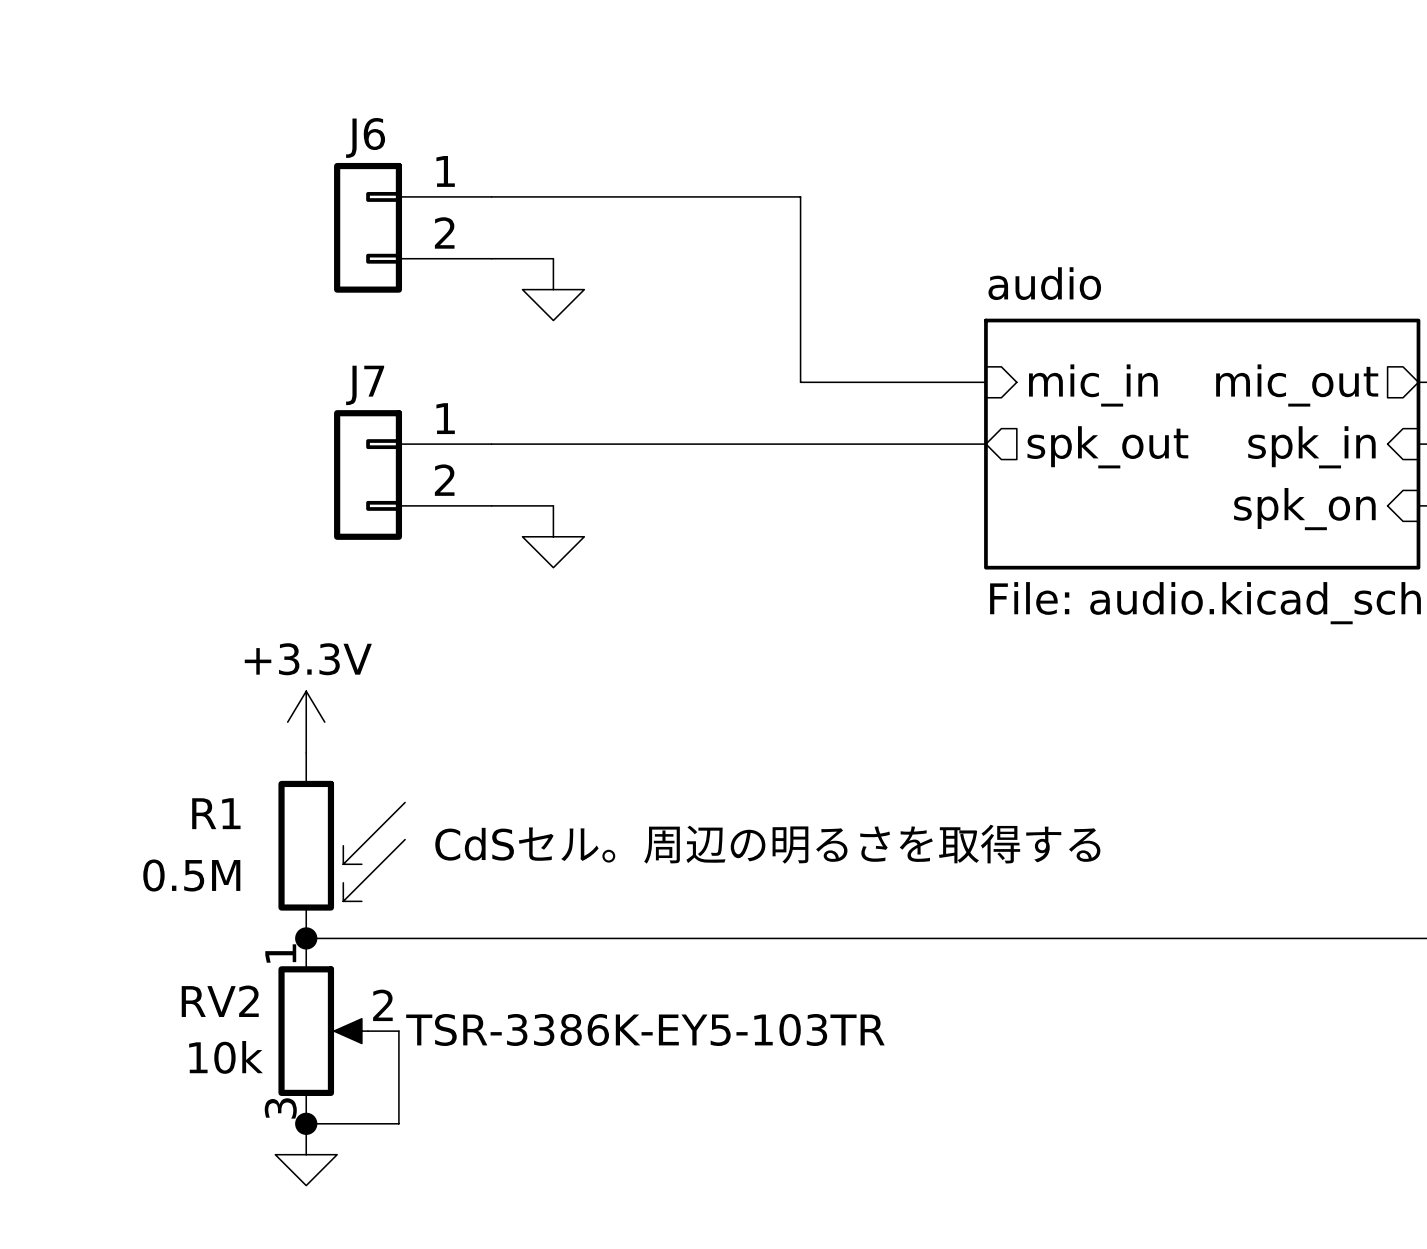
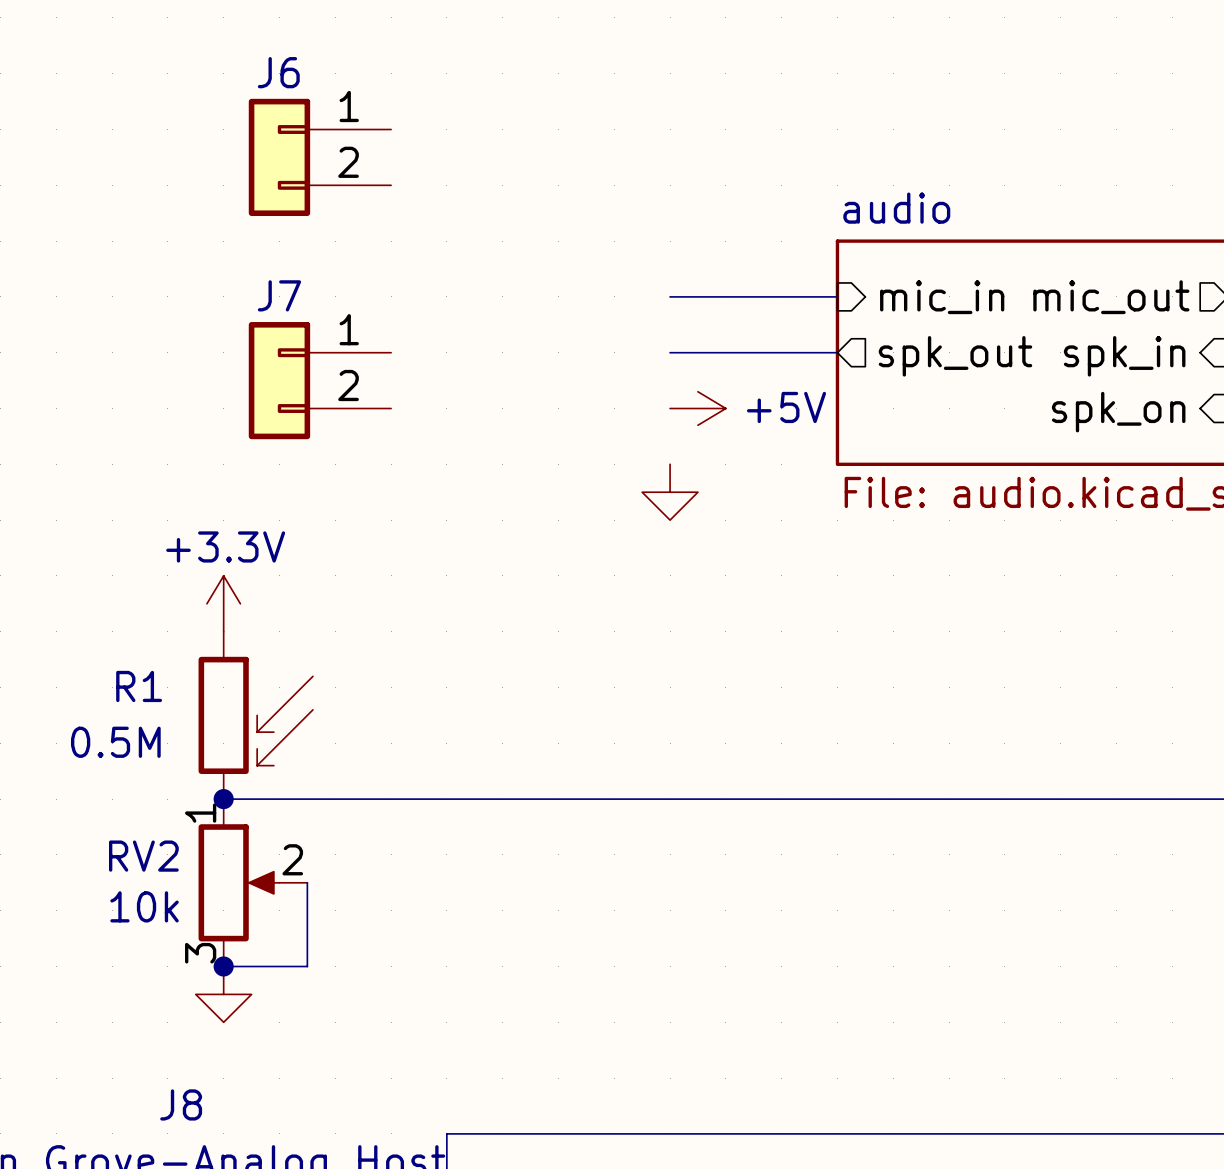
wire: (491, 196) (800, 196) (800, 382) -> none
wire: (491, 258) (553, 258) -> none
power symbol: (553, 289) -> none
wire: (491, 444) (800, 444) -> none
wire: (491, 505) (553, 505) -> none
power symbol: none -> +5V (697, 408)
power symbol: (553, 536) -> none
power symbol: none -> (670, 492)
R1 text: CdSセル。周辺の明るさを取得する (767, 844) -> none
RV2 text: TSR-3386K-EY5-103TR (645, 1029) -> none

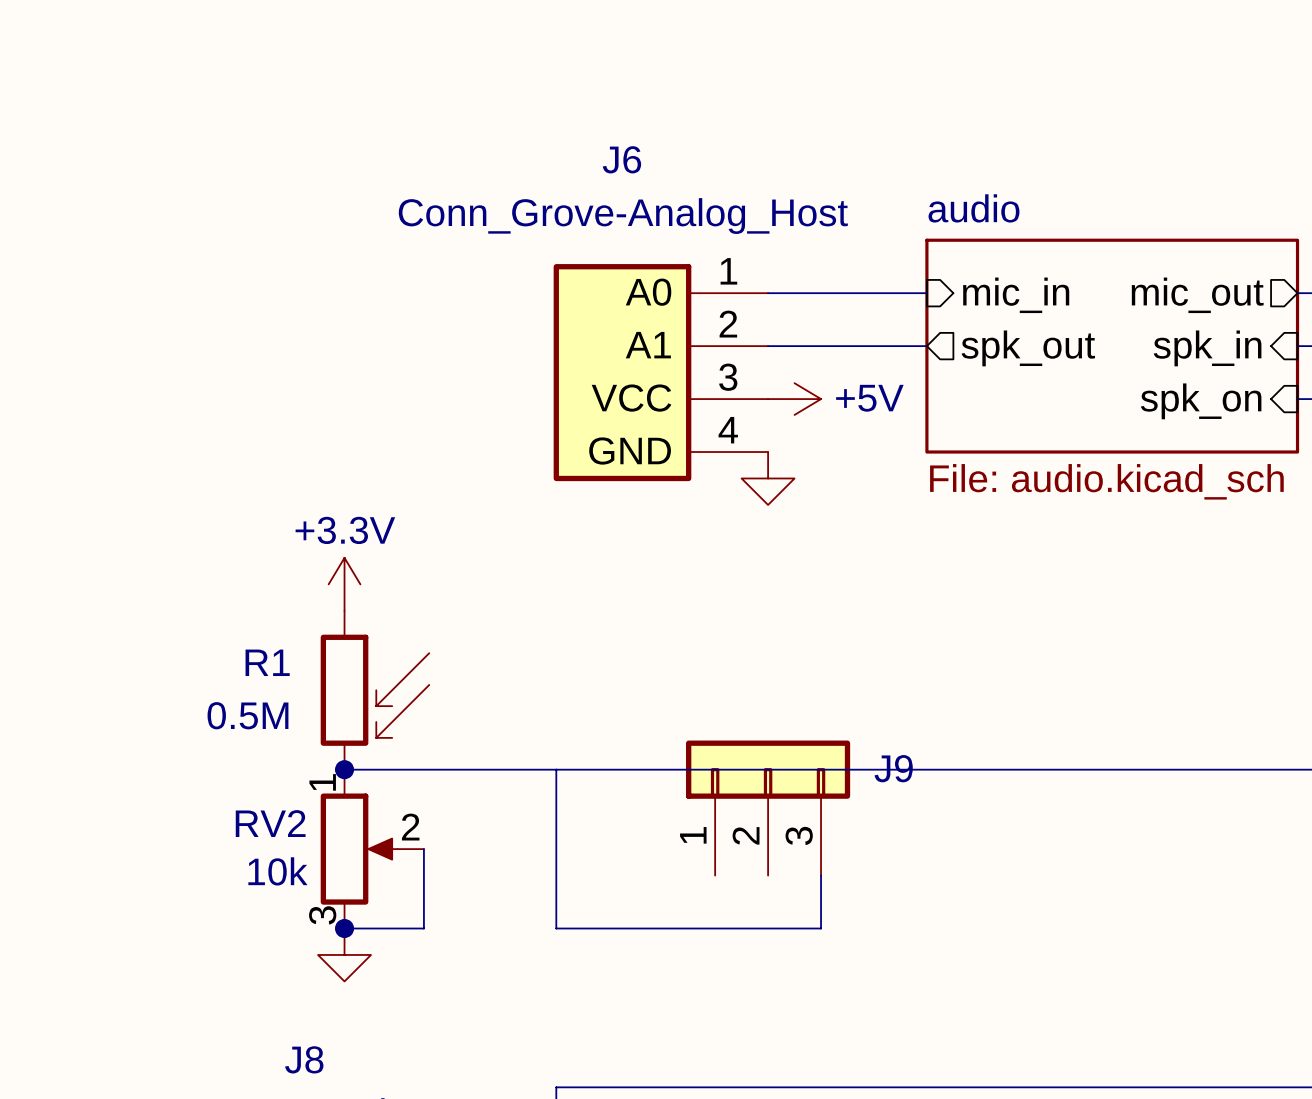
J6 name position: J6 (278, 72) -> J6 (621, 159)
J6 symbol: [248, 98, 392, 217] -> [553, 264, 769, 482]
J6 value: none -> Conn_Grove-Analog_Host (623, 216)
J7: (319, 380) -> none
wire: none -> (556, 769) (556, 928) (821, 928) (821, 875)
J9: none -> (768, 808)

